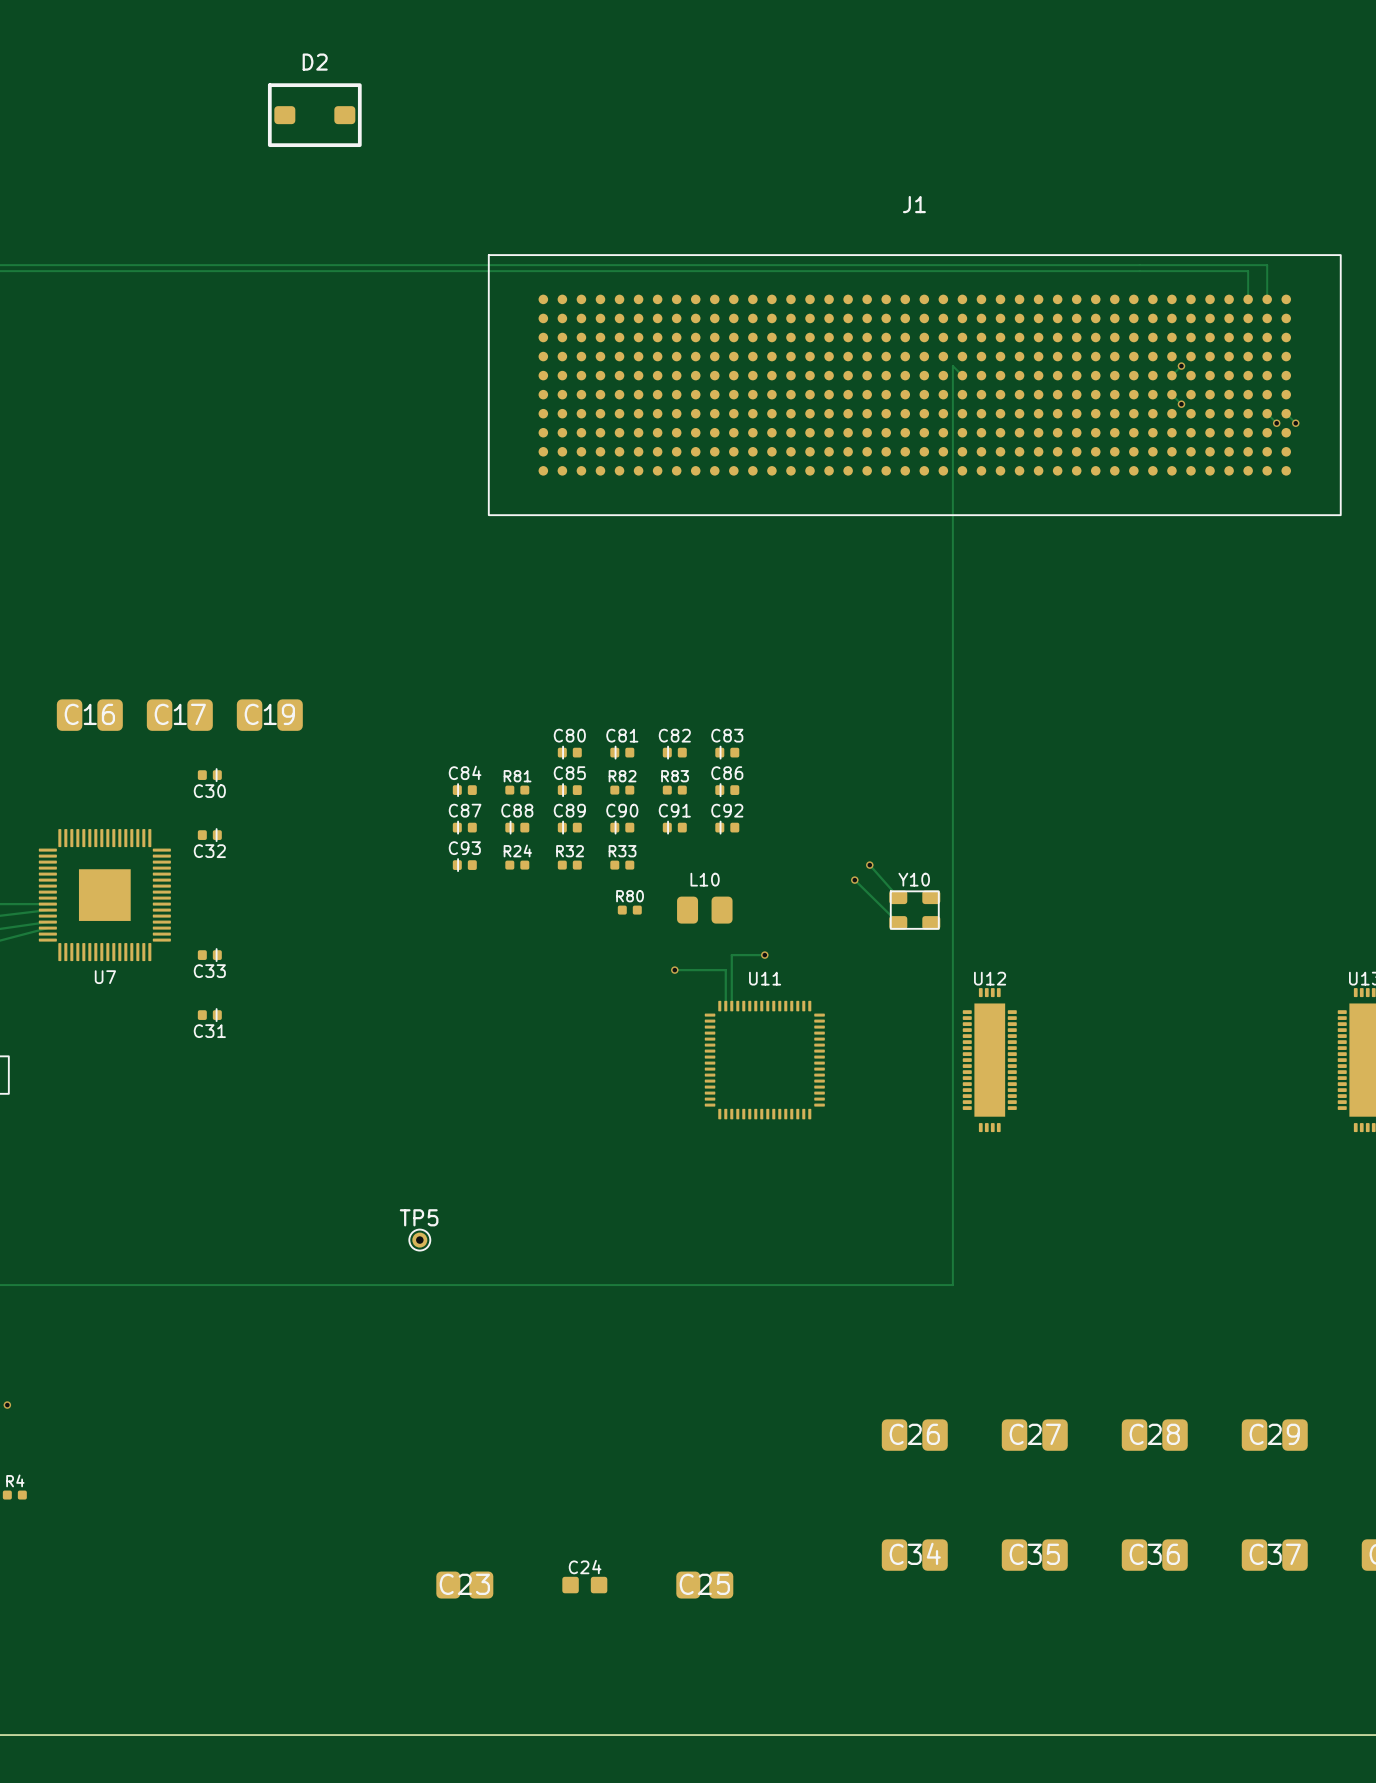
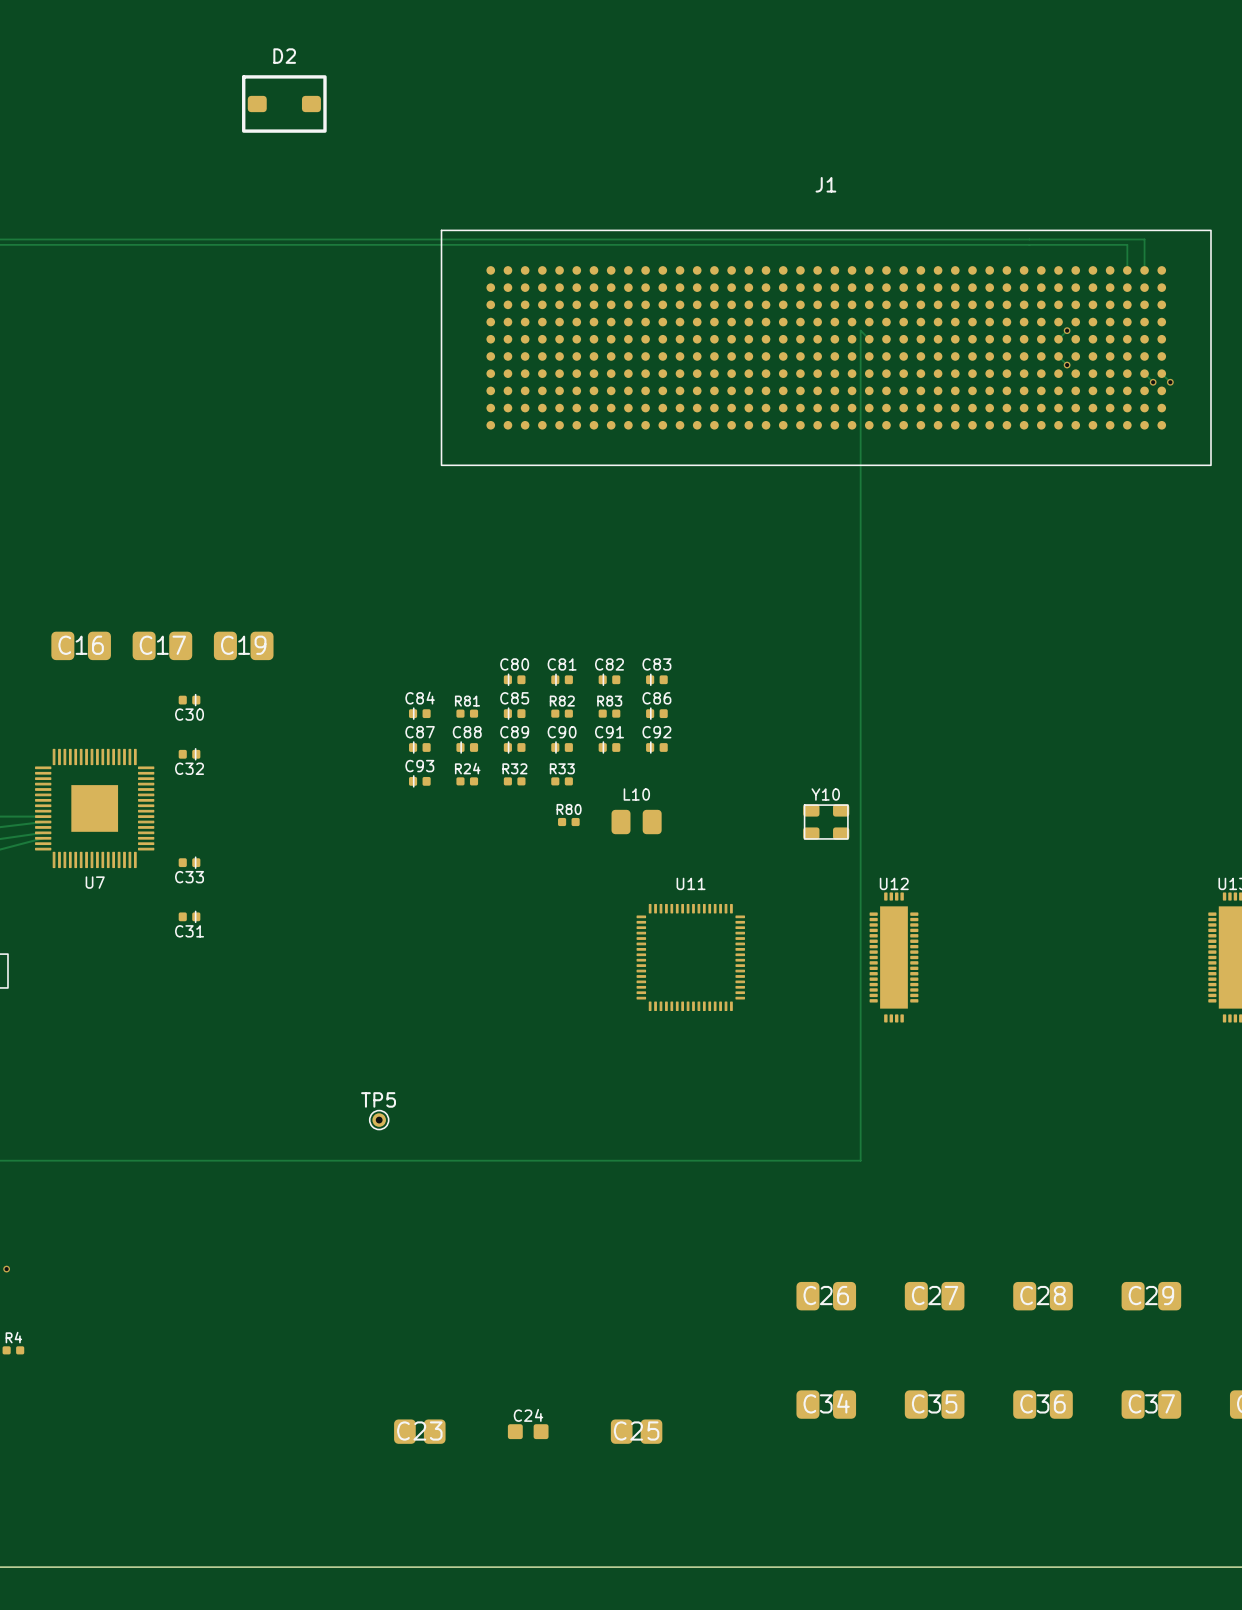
track: (869, 865) (898, 897) -> none
via: (869, 865) -> none
track: (854, 880) (898, 922) -> none
via: (854, 880) -> none
track: (764, 955) (731, 955) (731, 1006) -> none
via: (764, 955) -> none
track: (674, 970) (725, 970) (725, 1006) -> none
via: (674, 970) -> none

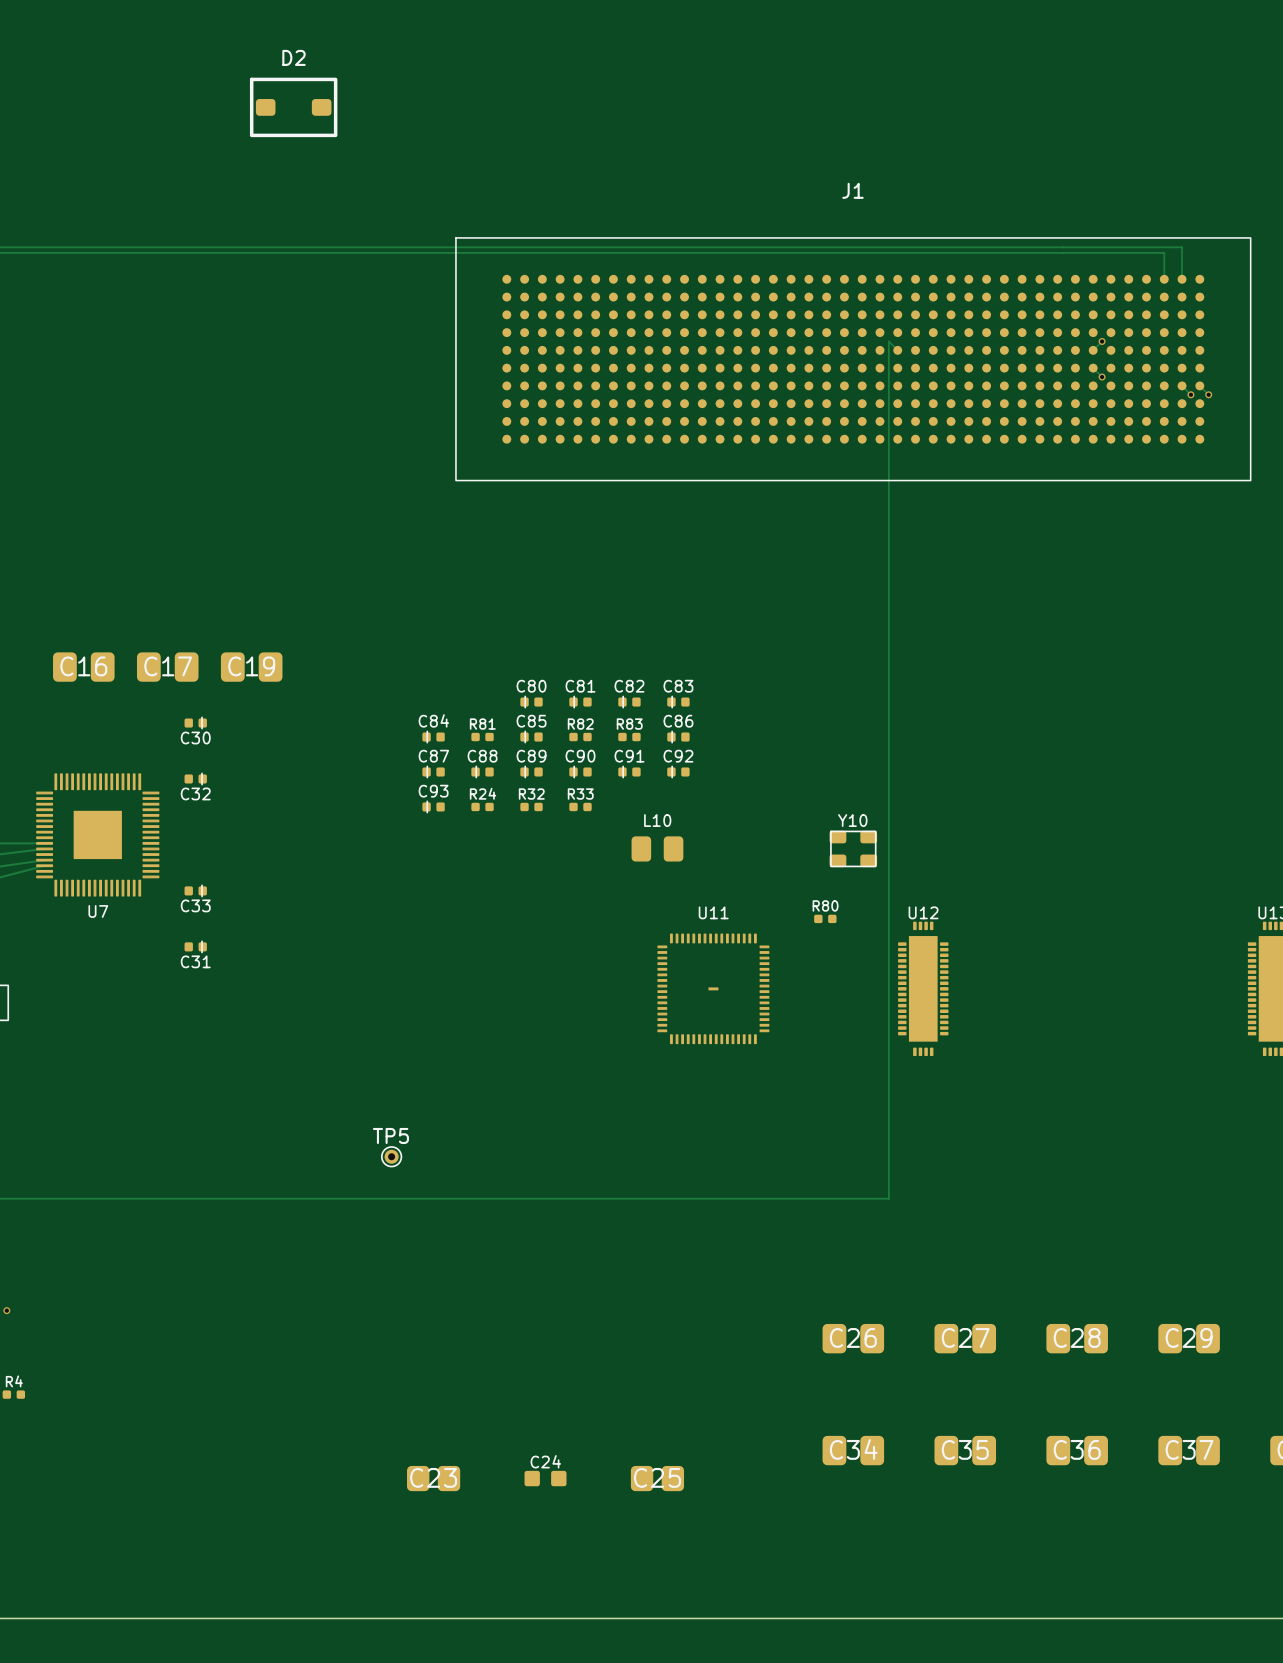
R80 position: (568, 822) -> (825, 918)
U11 footprint: [636, 903, 745, 1012] -> [657, 933, 770, 1045]

